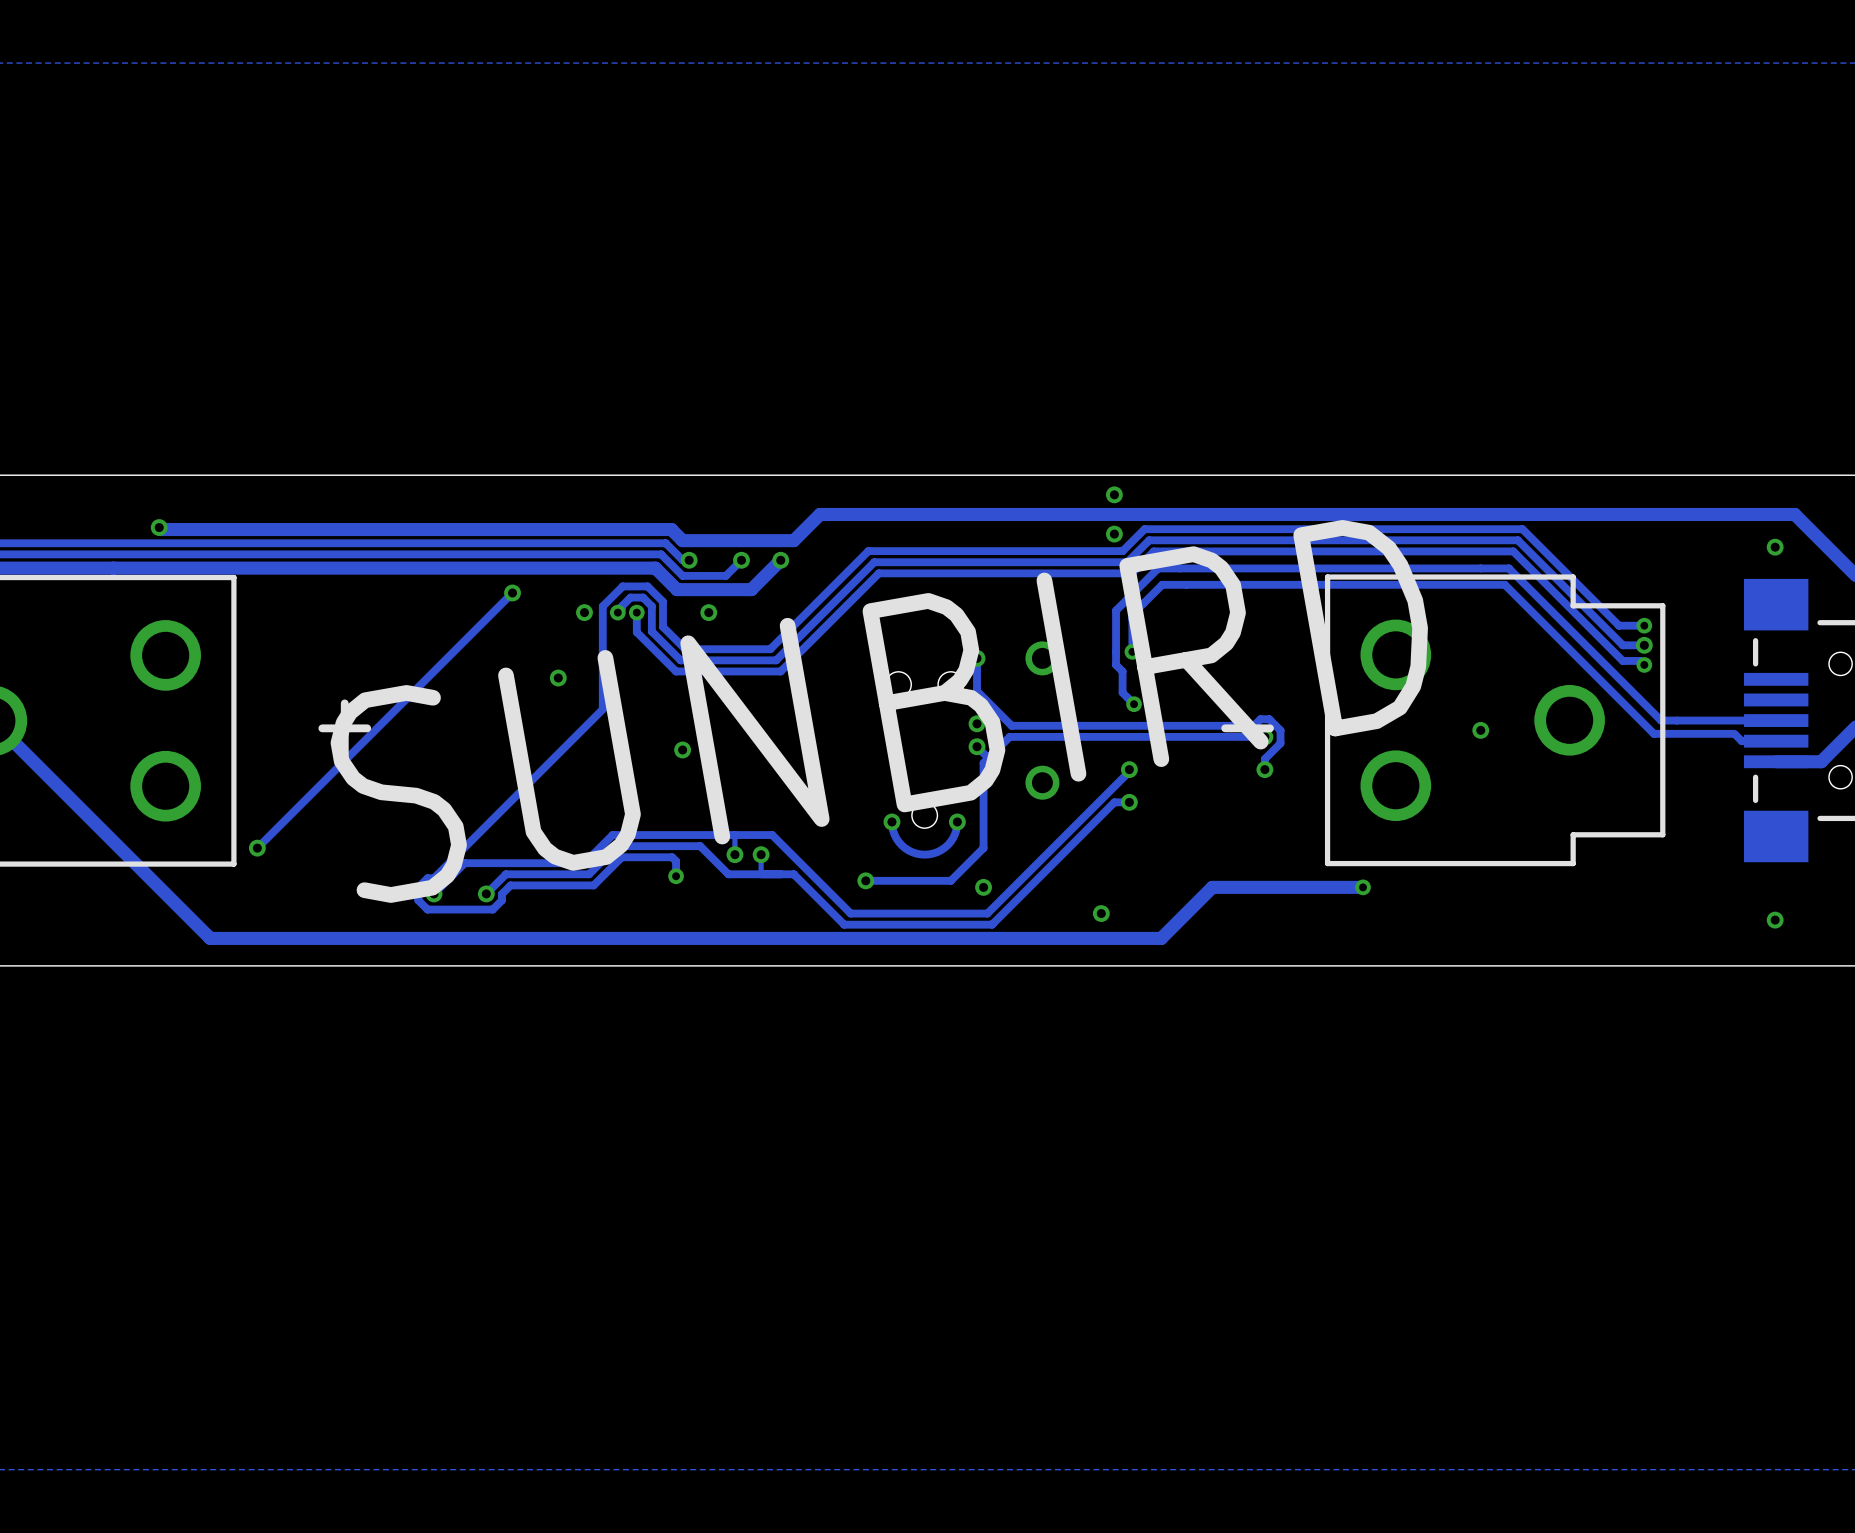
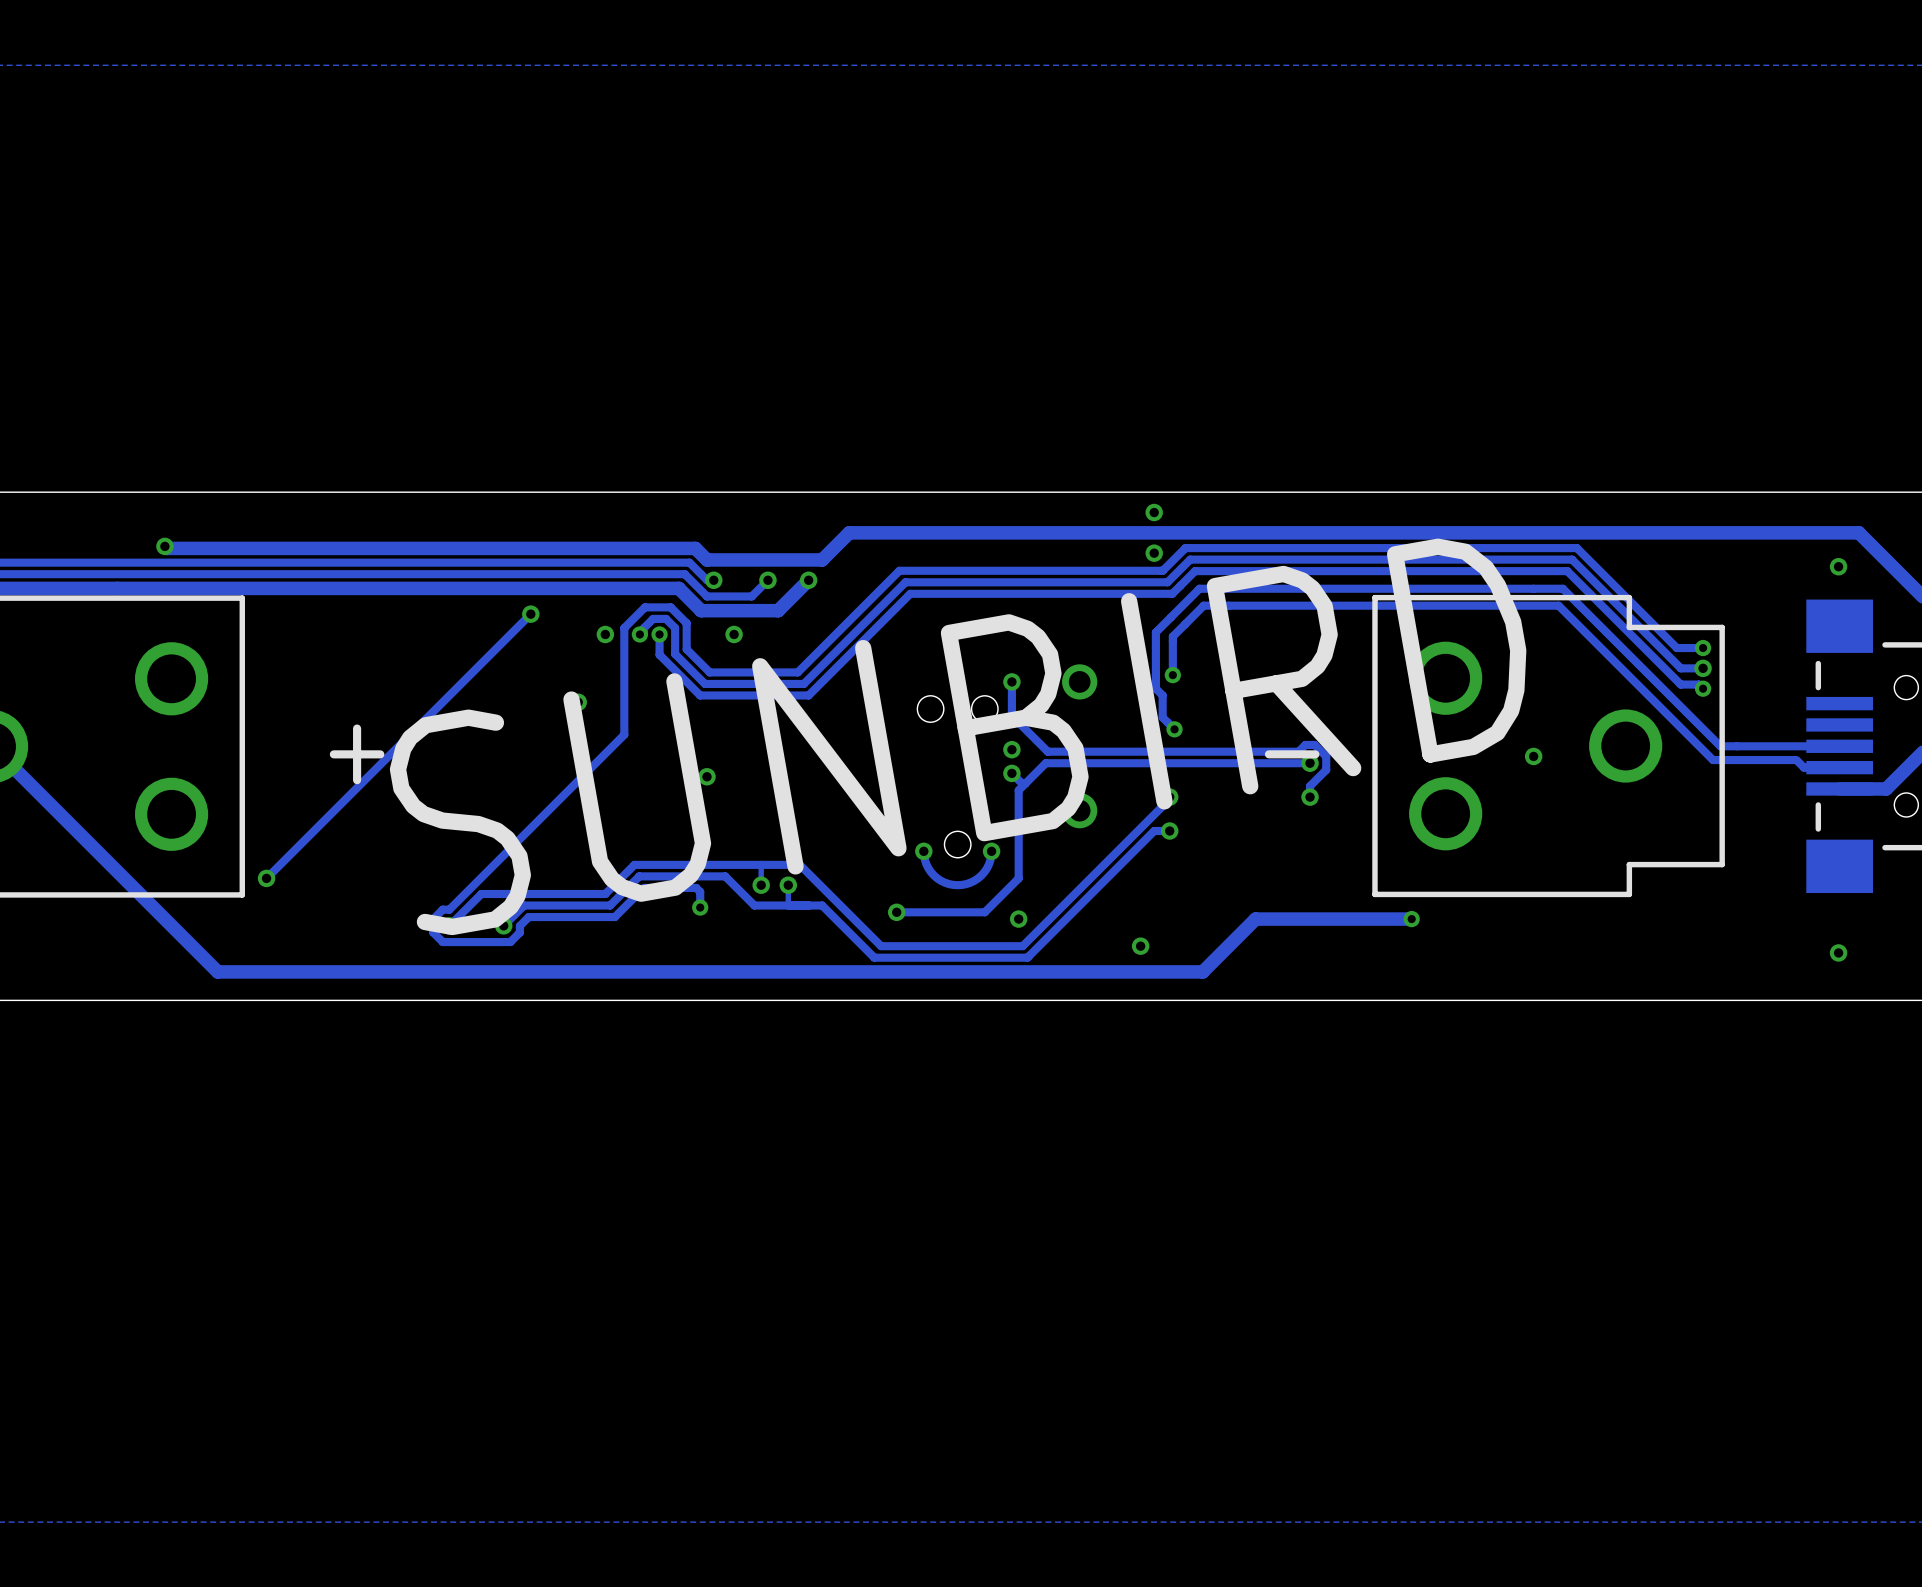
text position: SUNBIRD (879, 711) -> SUNBIRD (958, 736)

